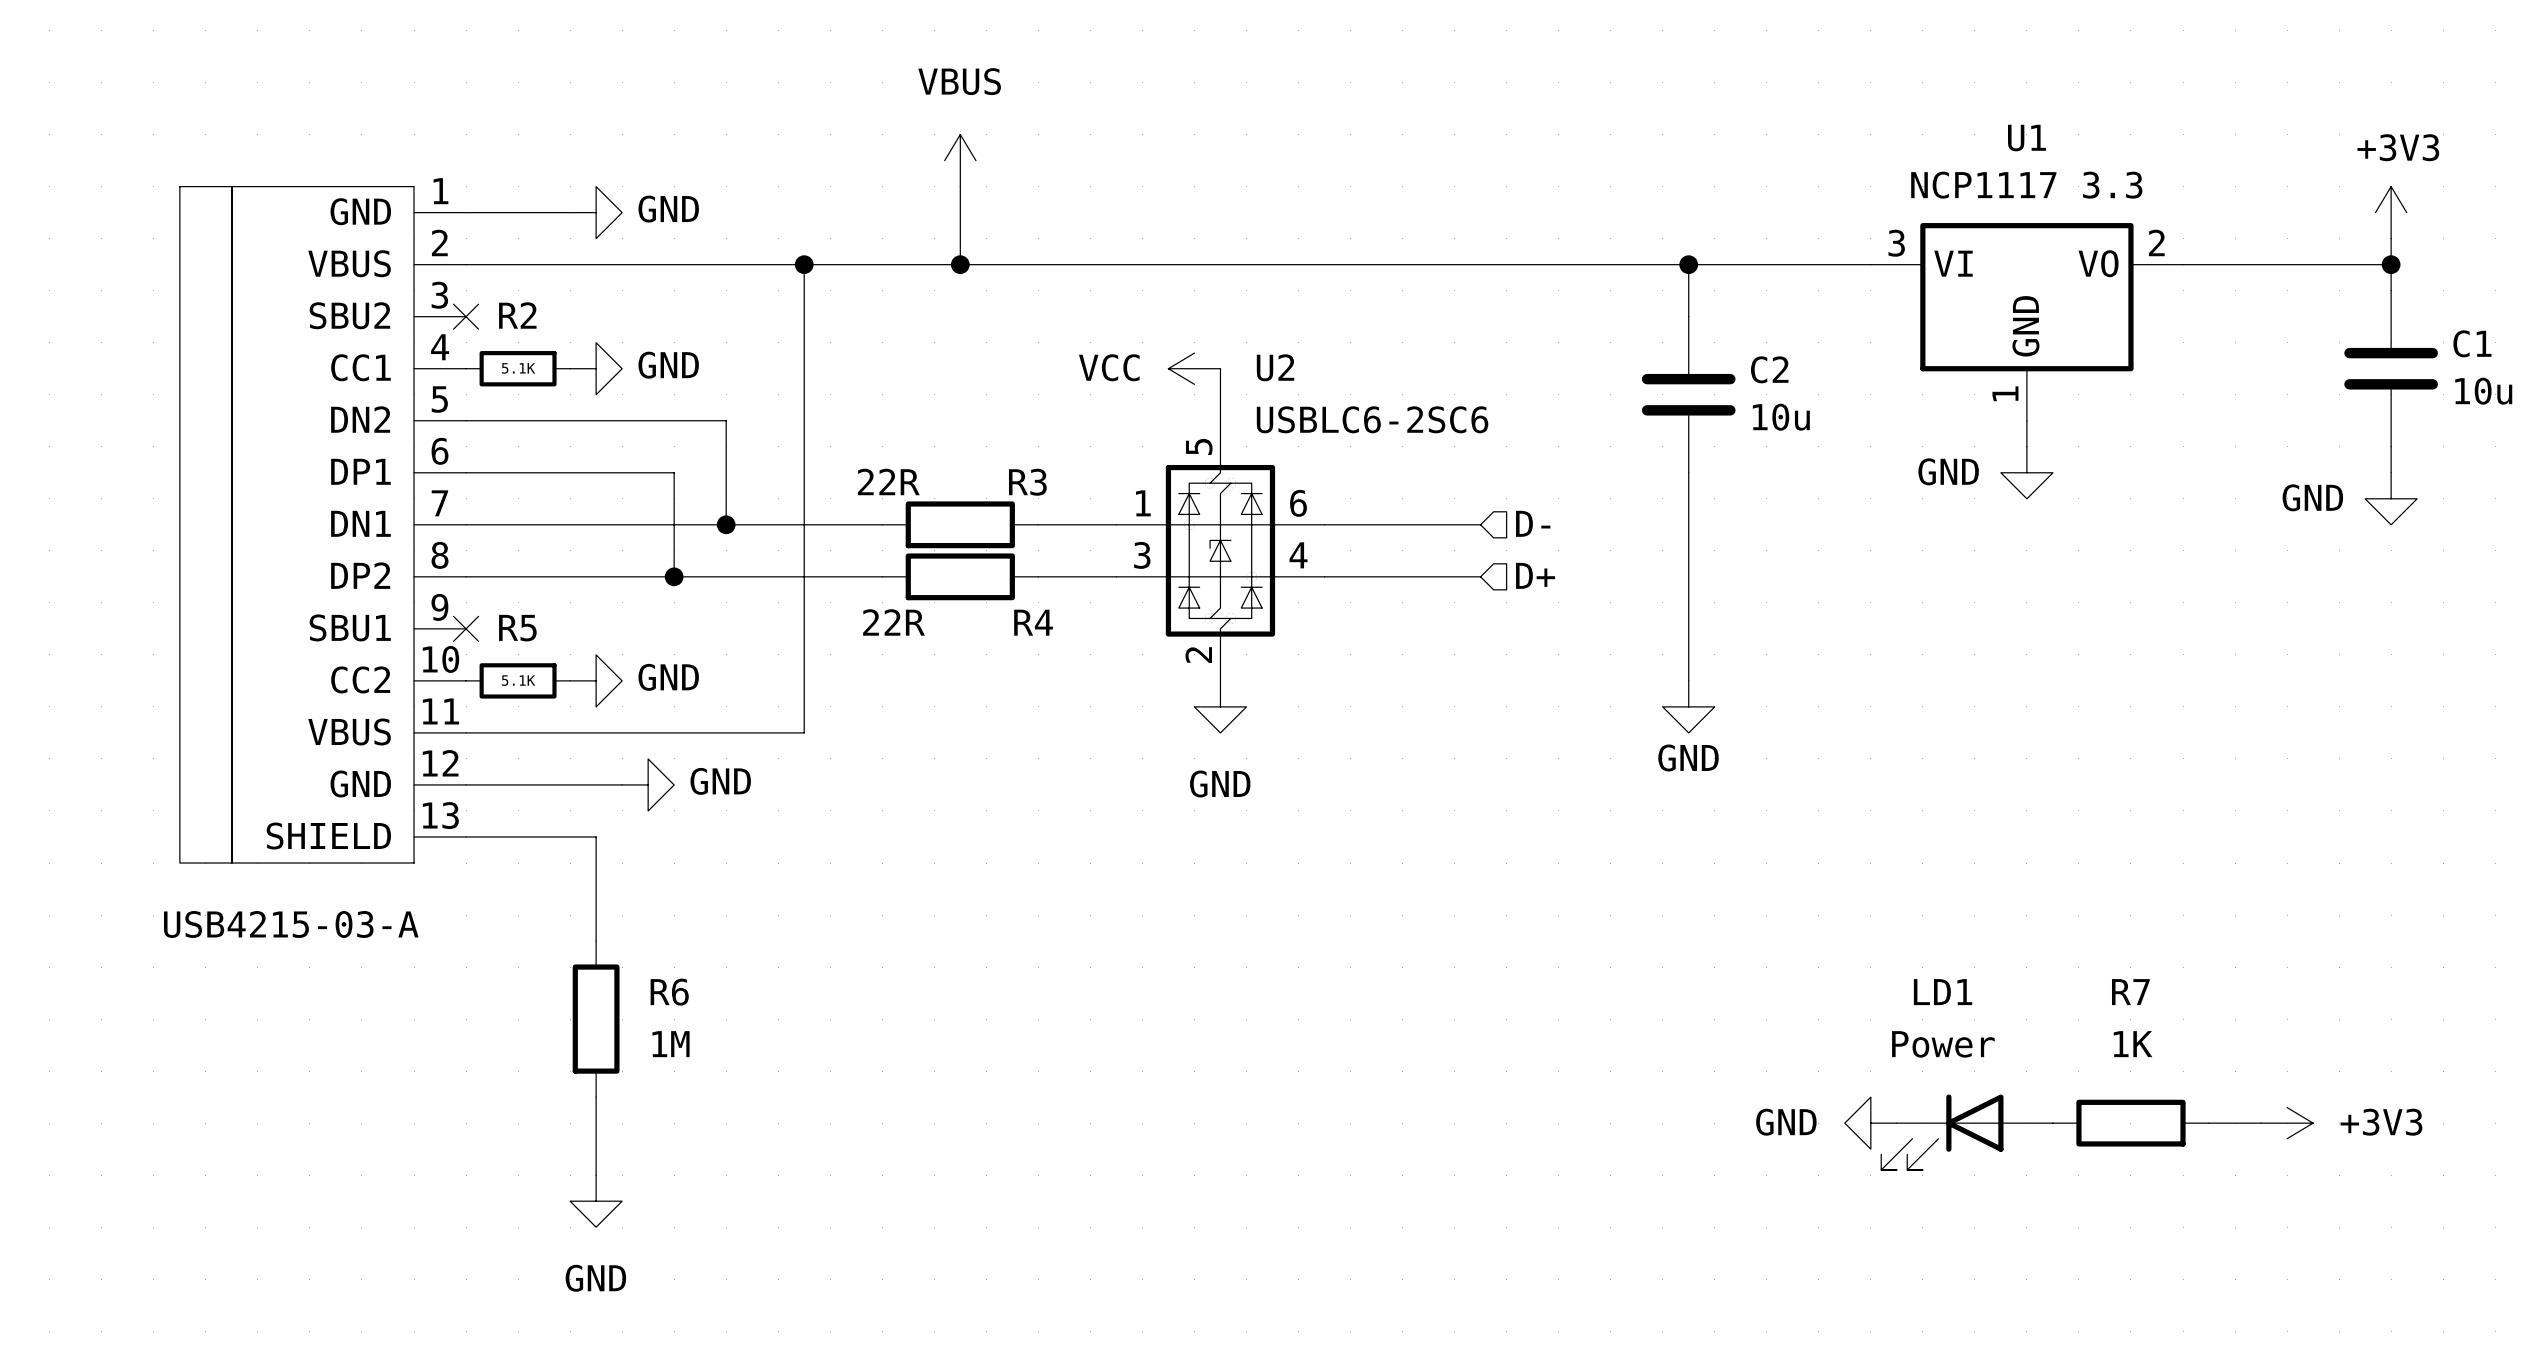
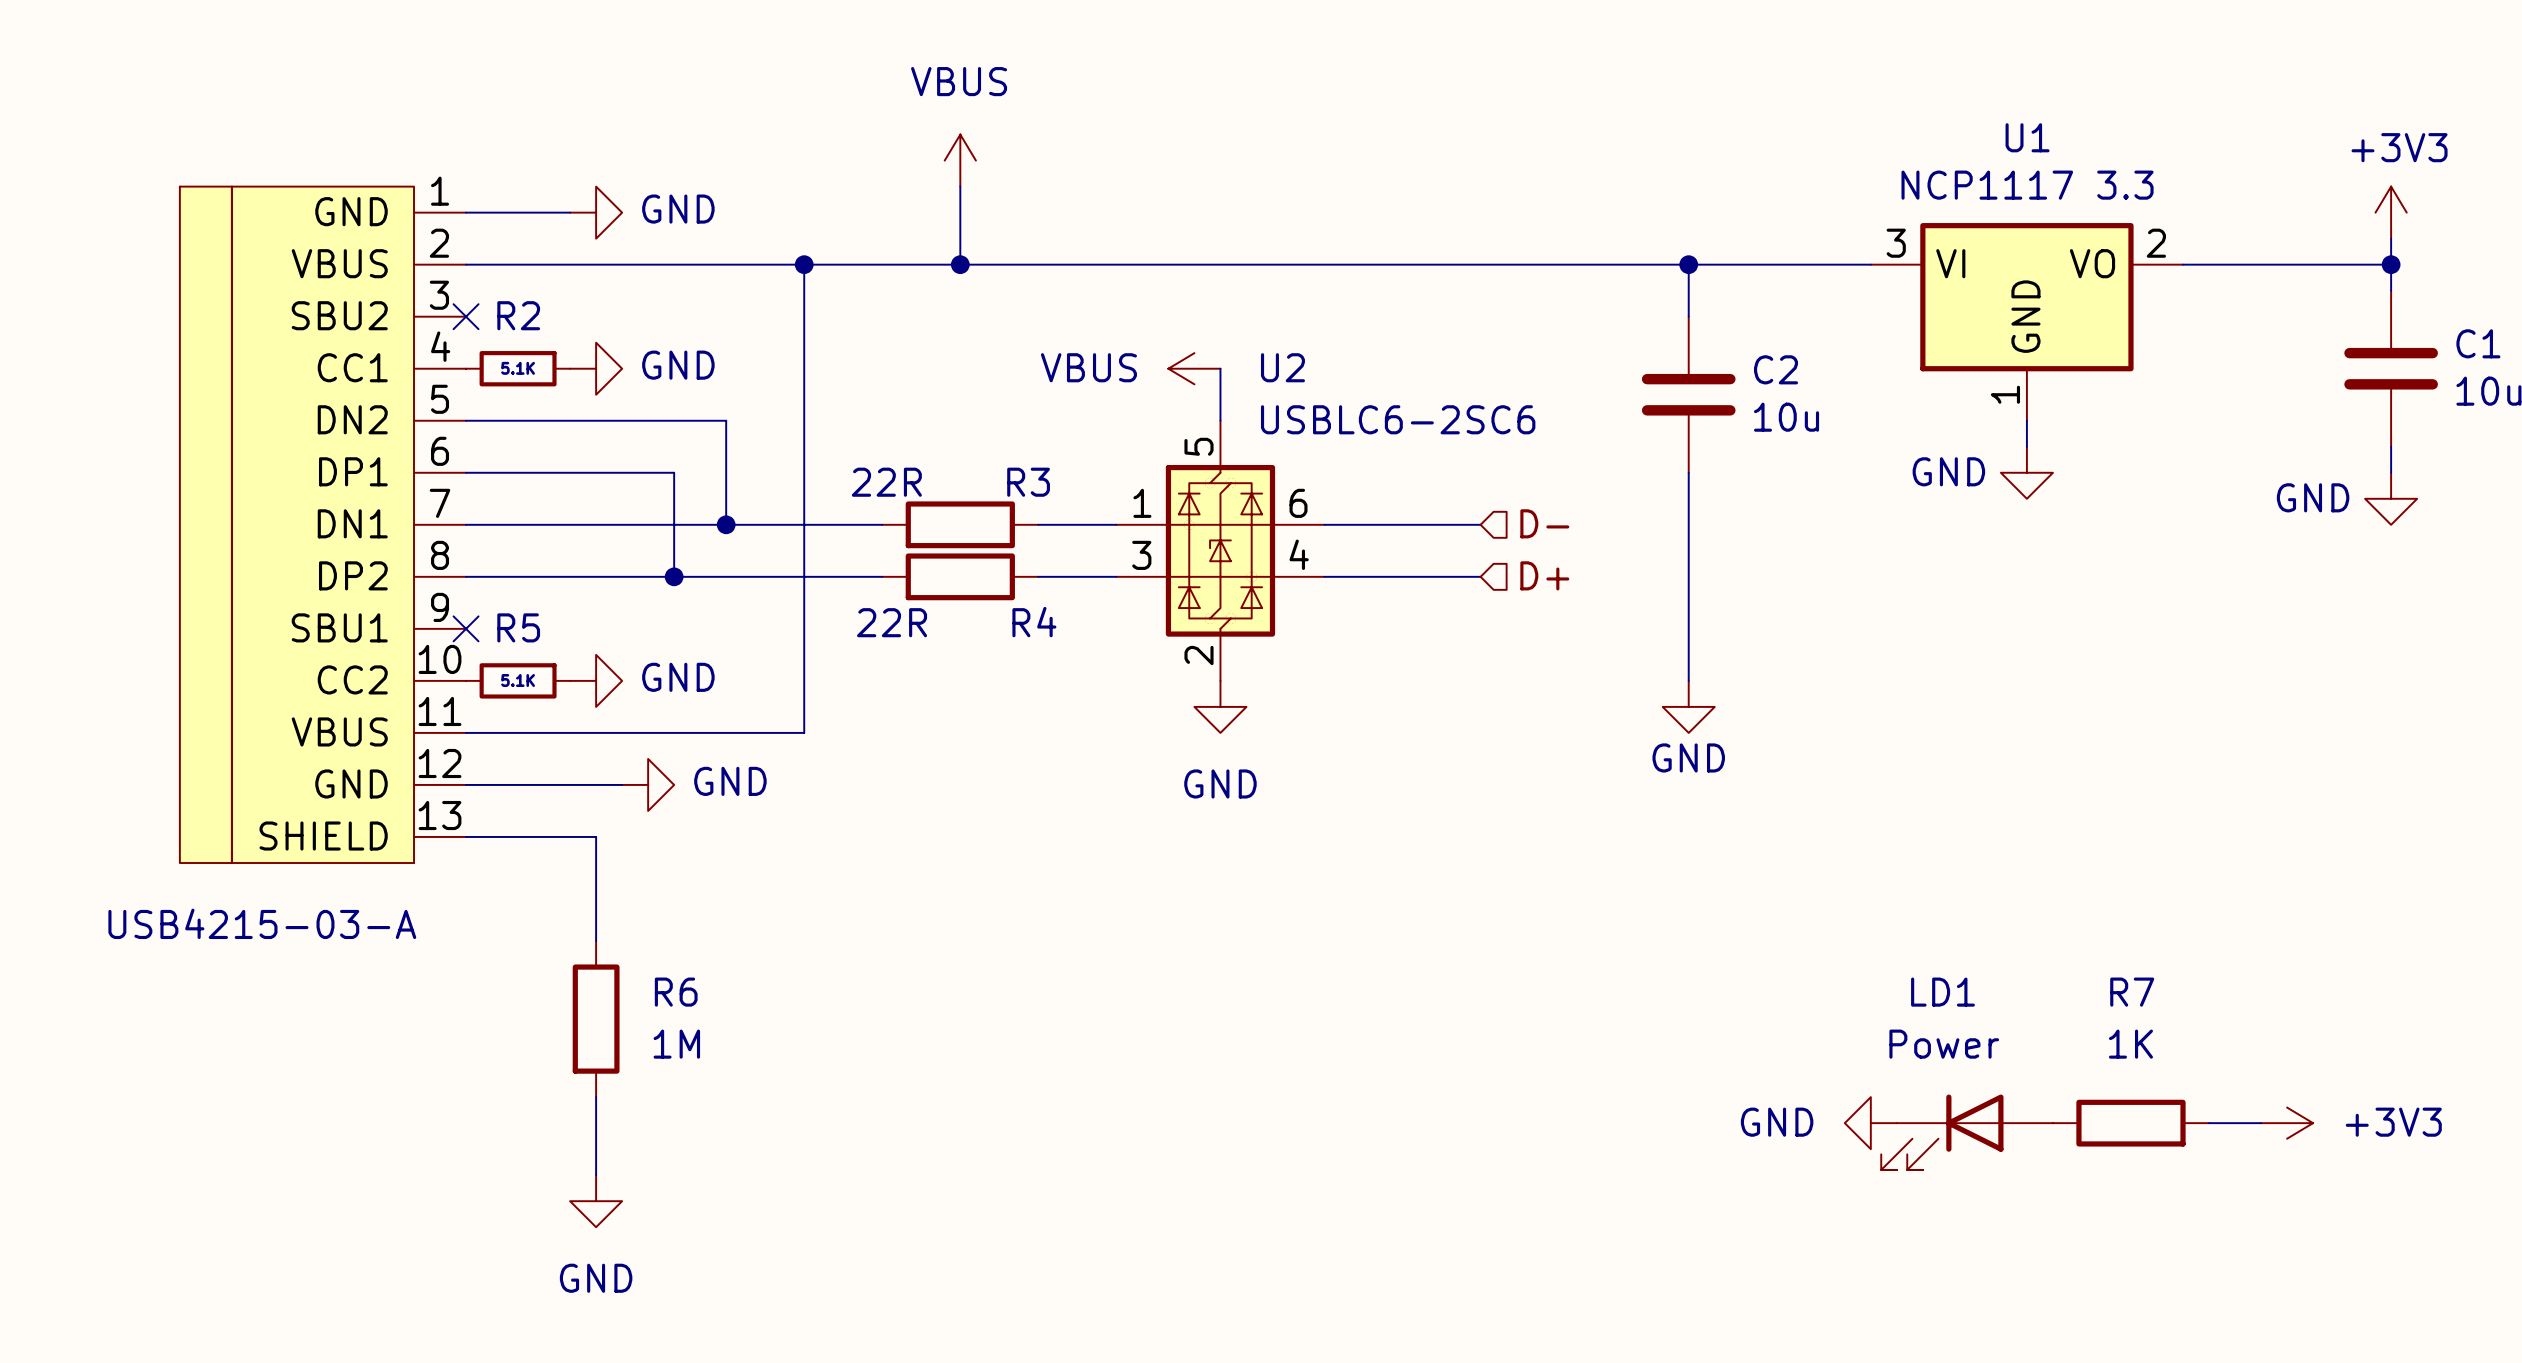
power symbol: VCC (1194, 368) -> VBUS (1194, 368)

